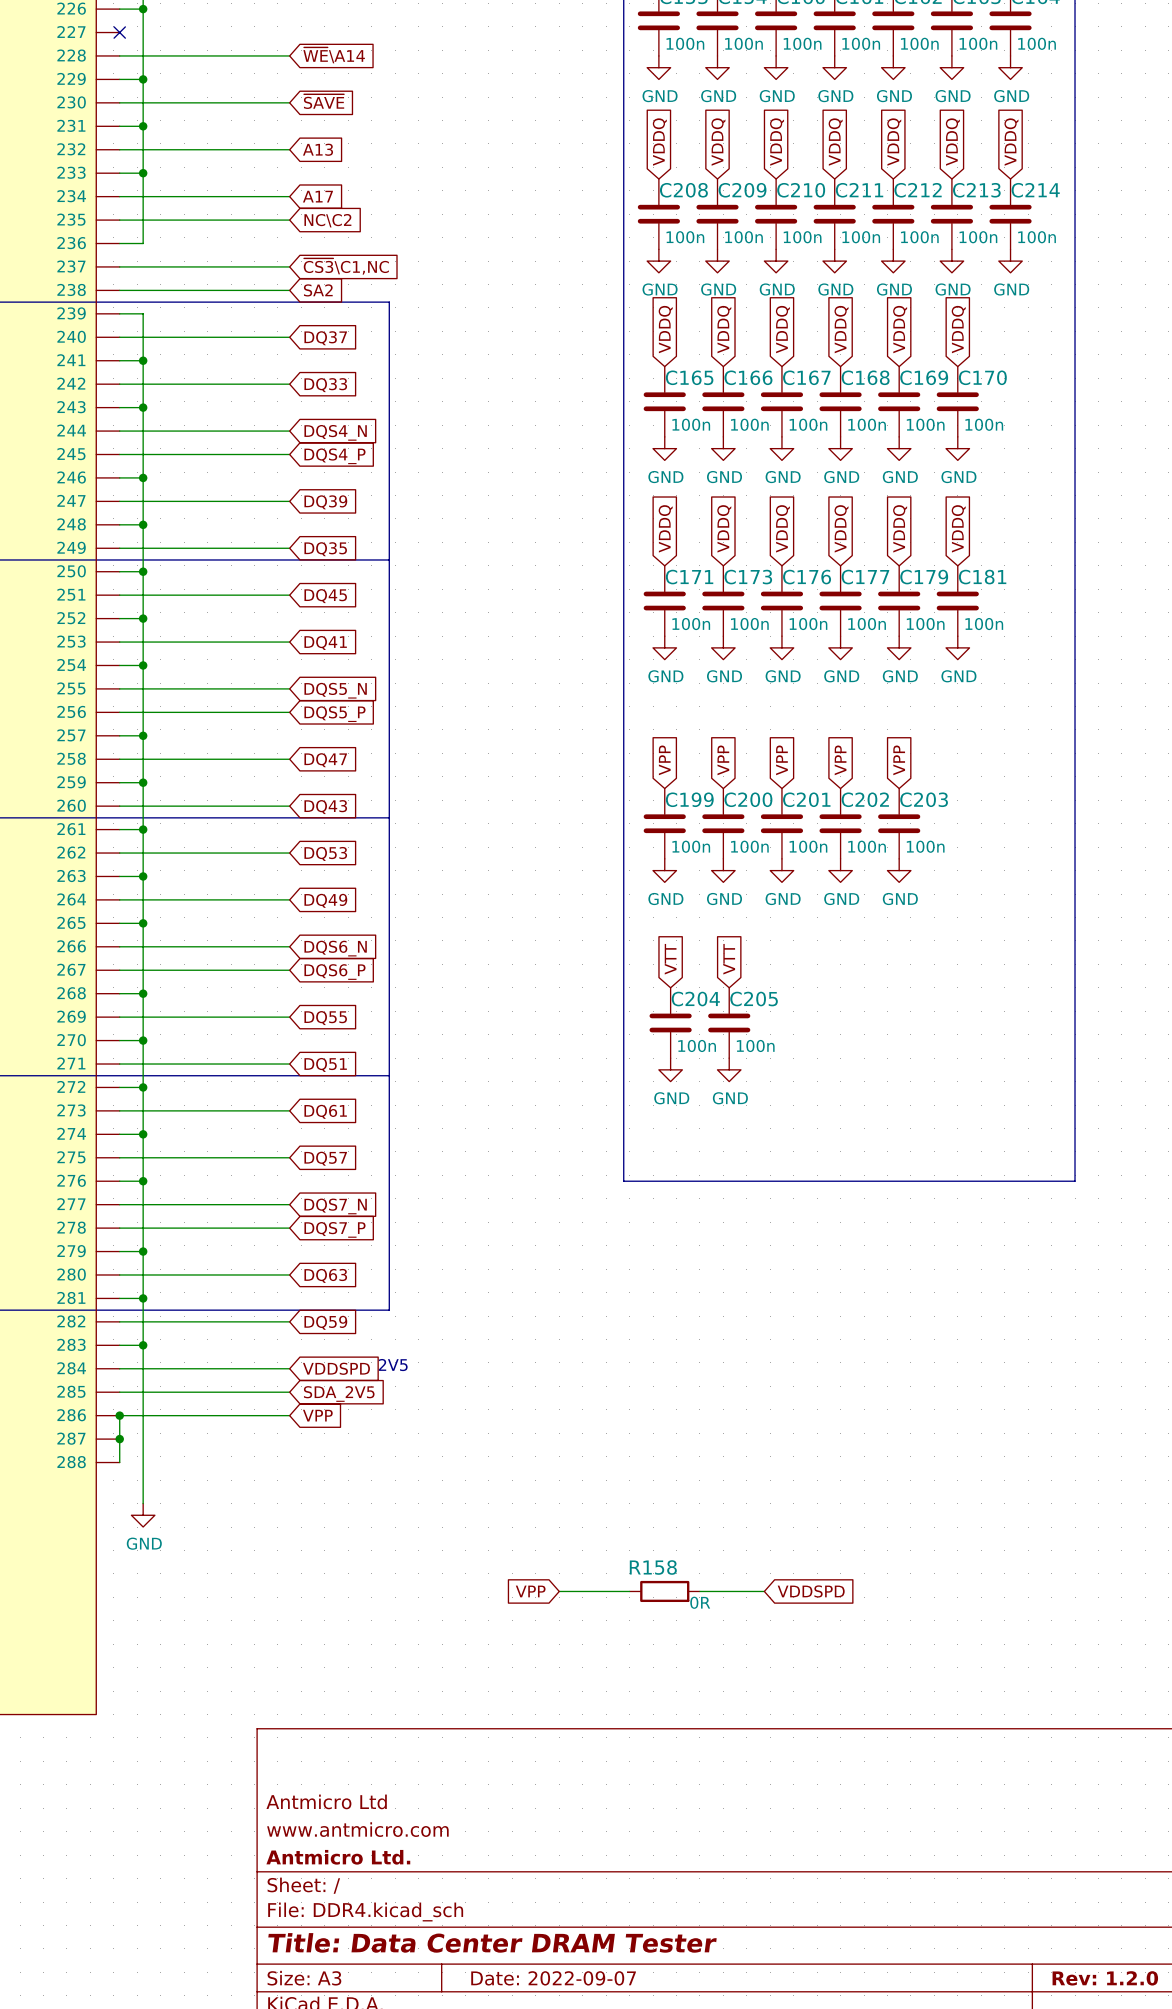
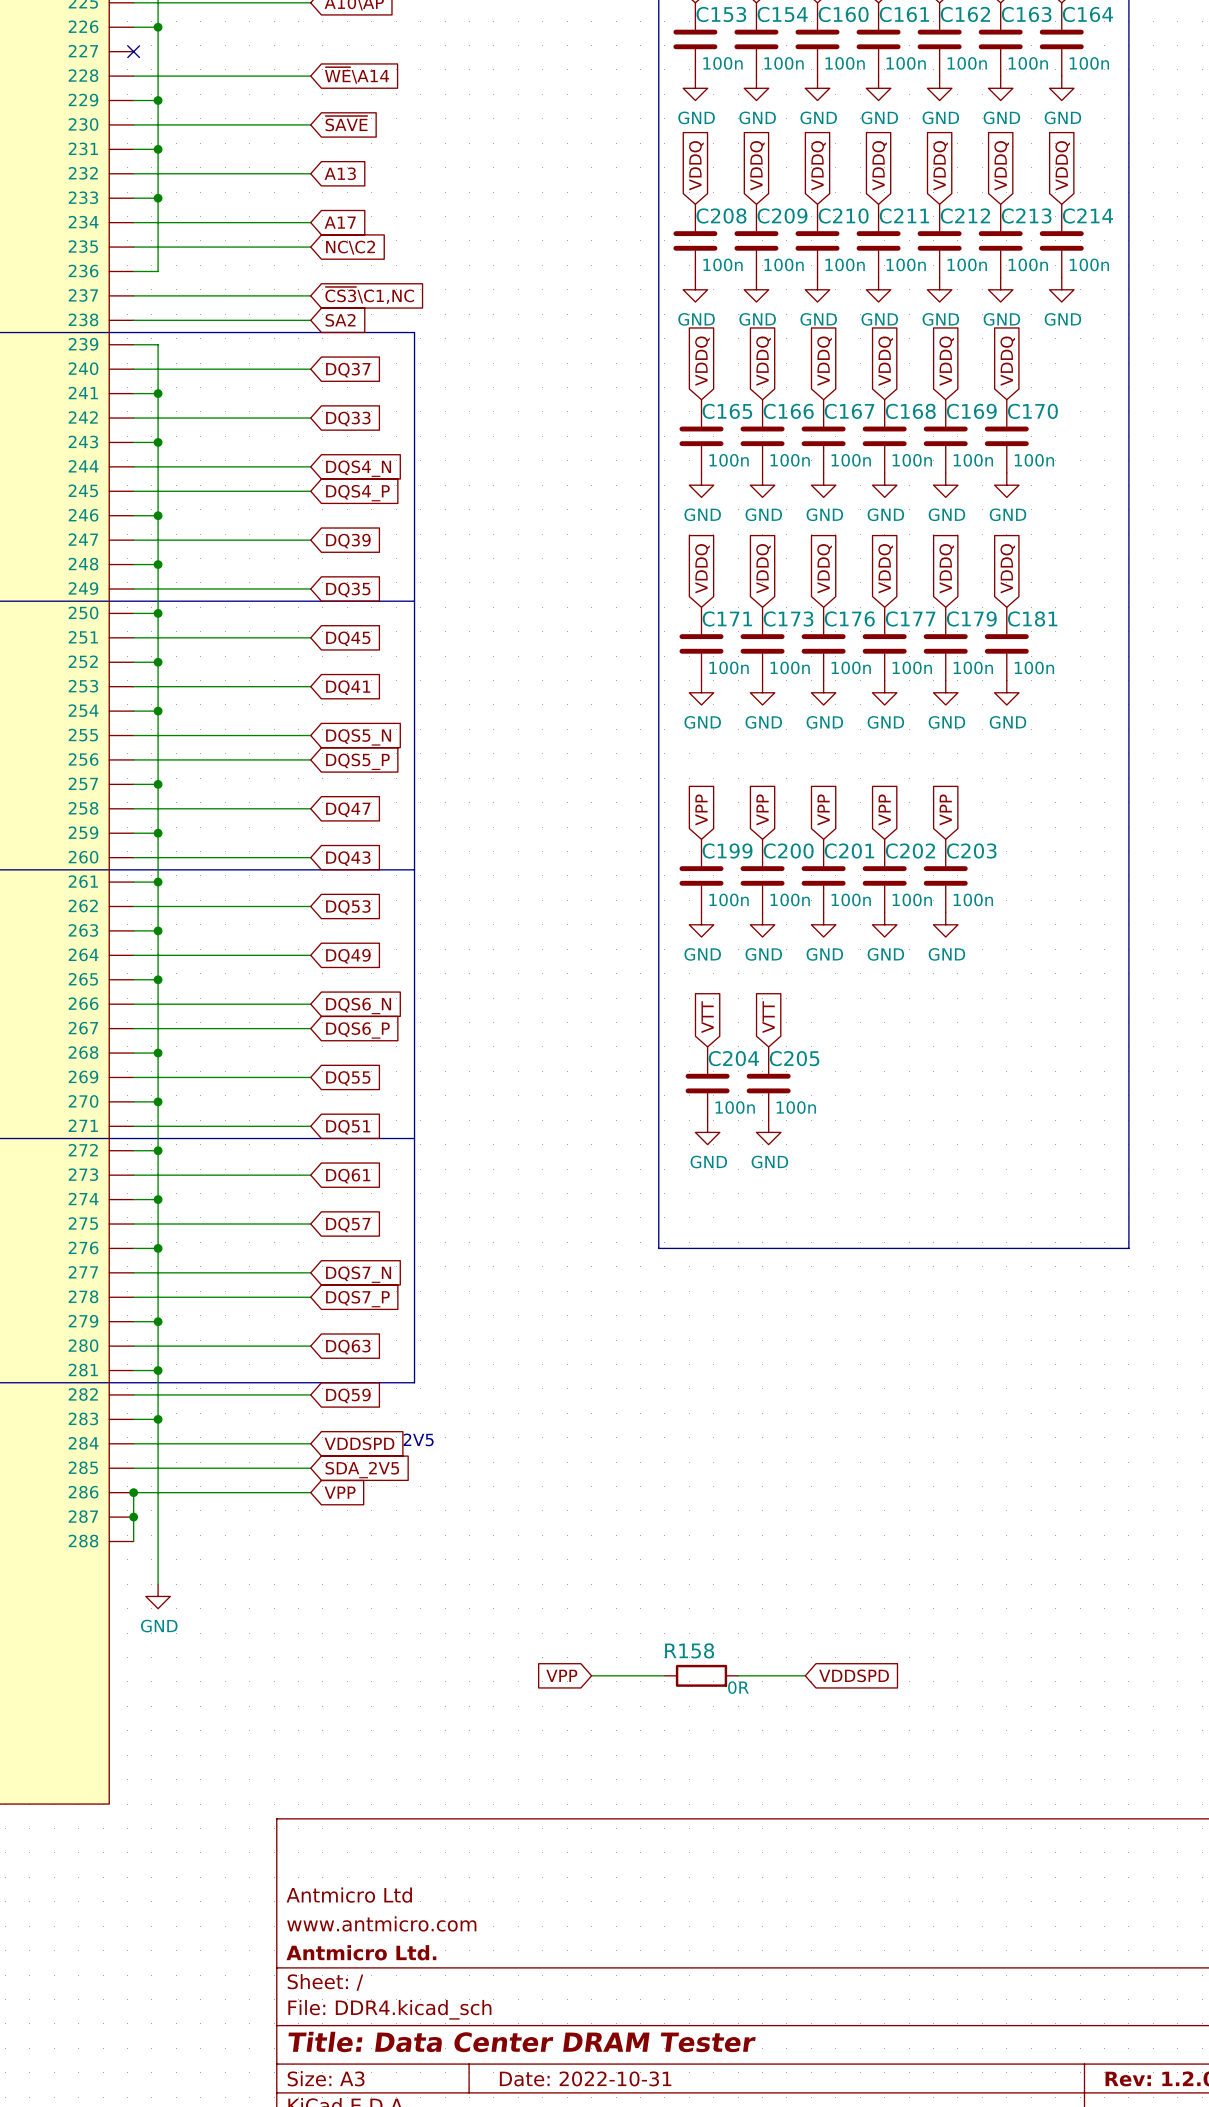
title block: Date: 2022-09-07 (553, 1978) -> Date: 2022-10-31 (585, 2078)

